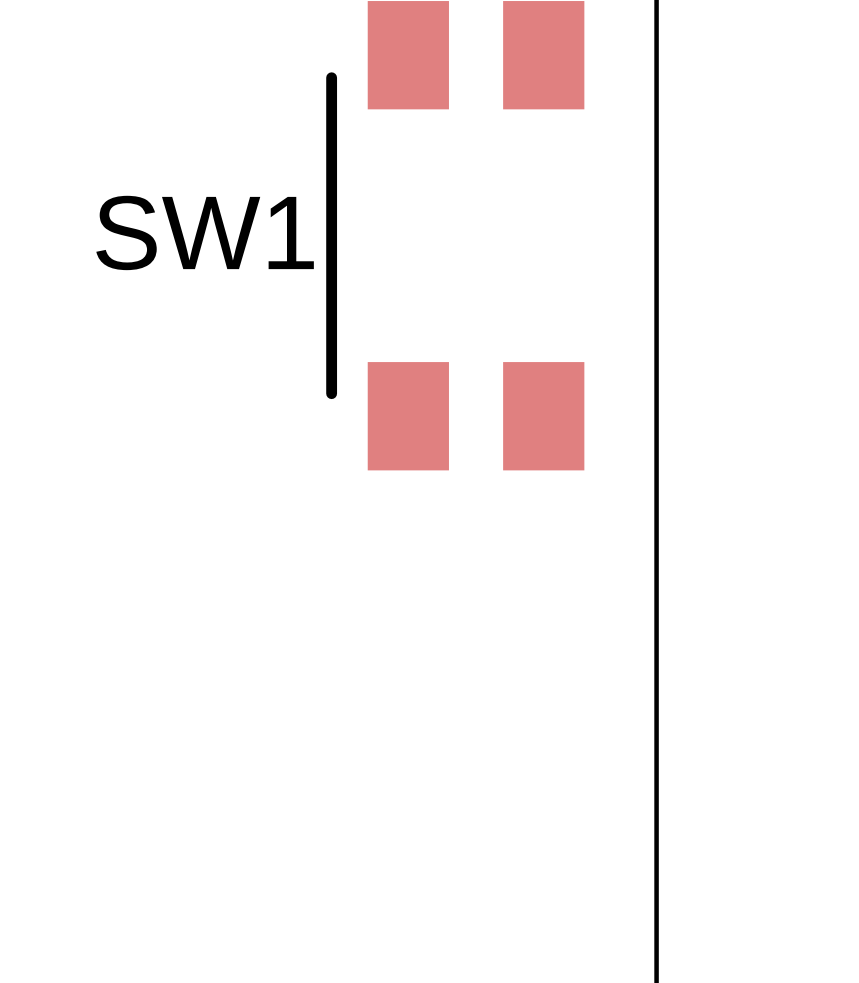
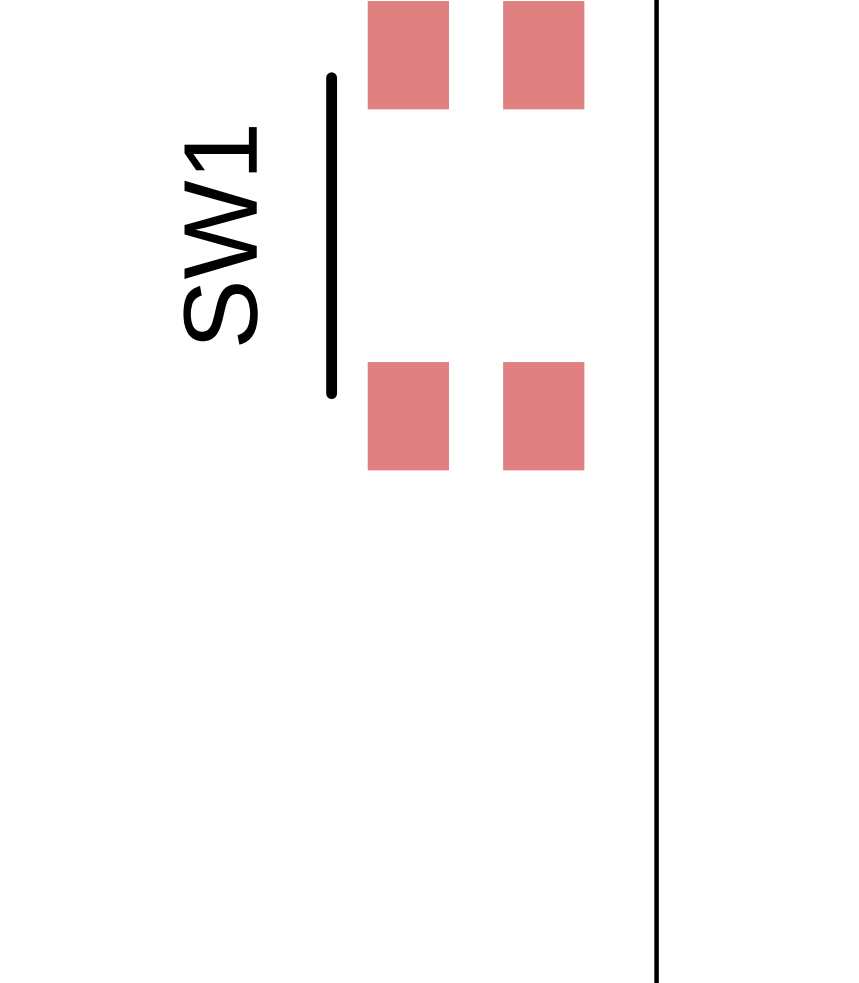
SW1 name rotation: 0° (205, 232) -> 90° counterclockwise (220, 235)

